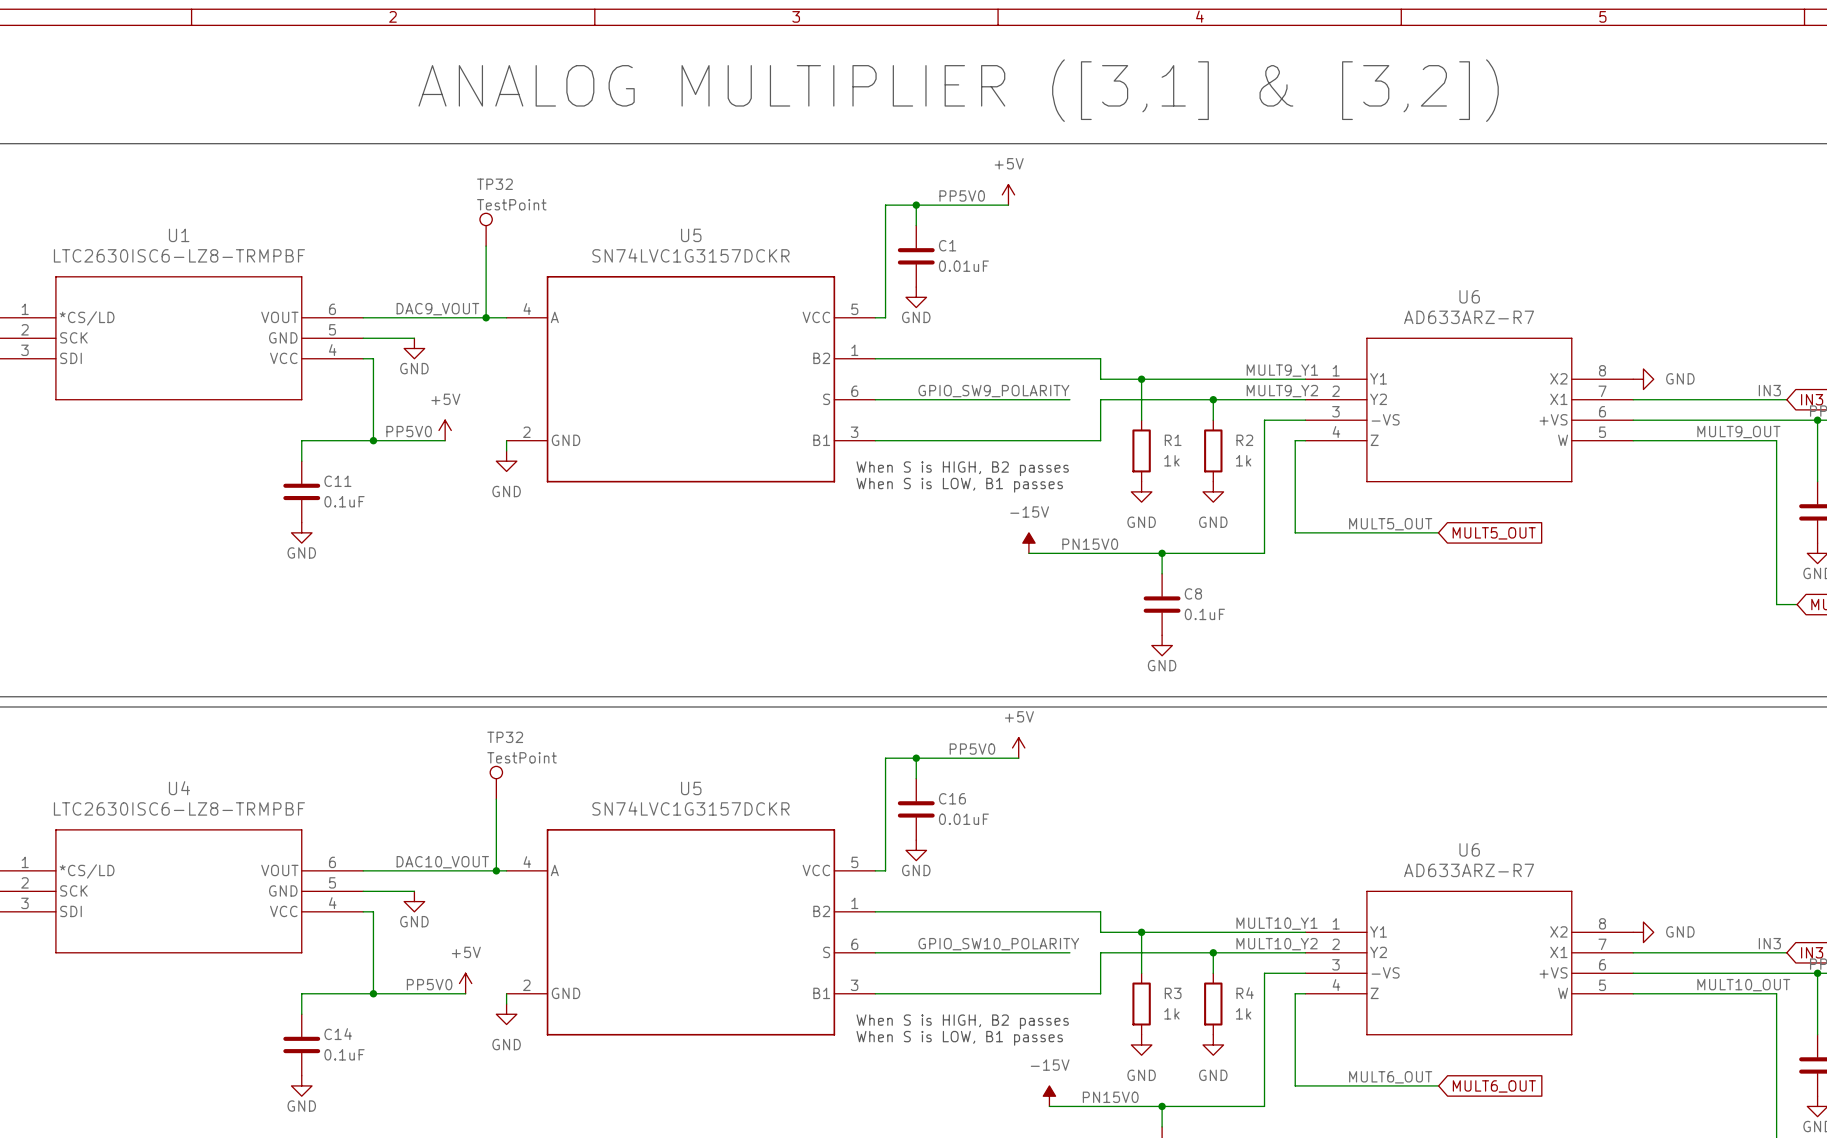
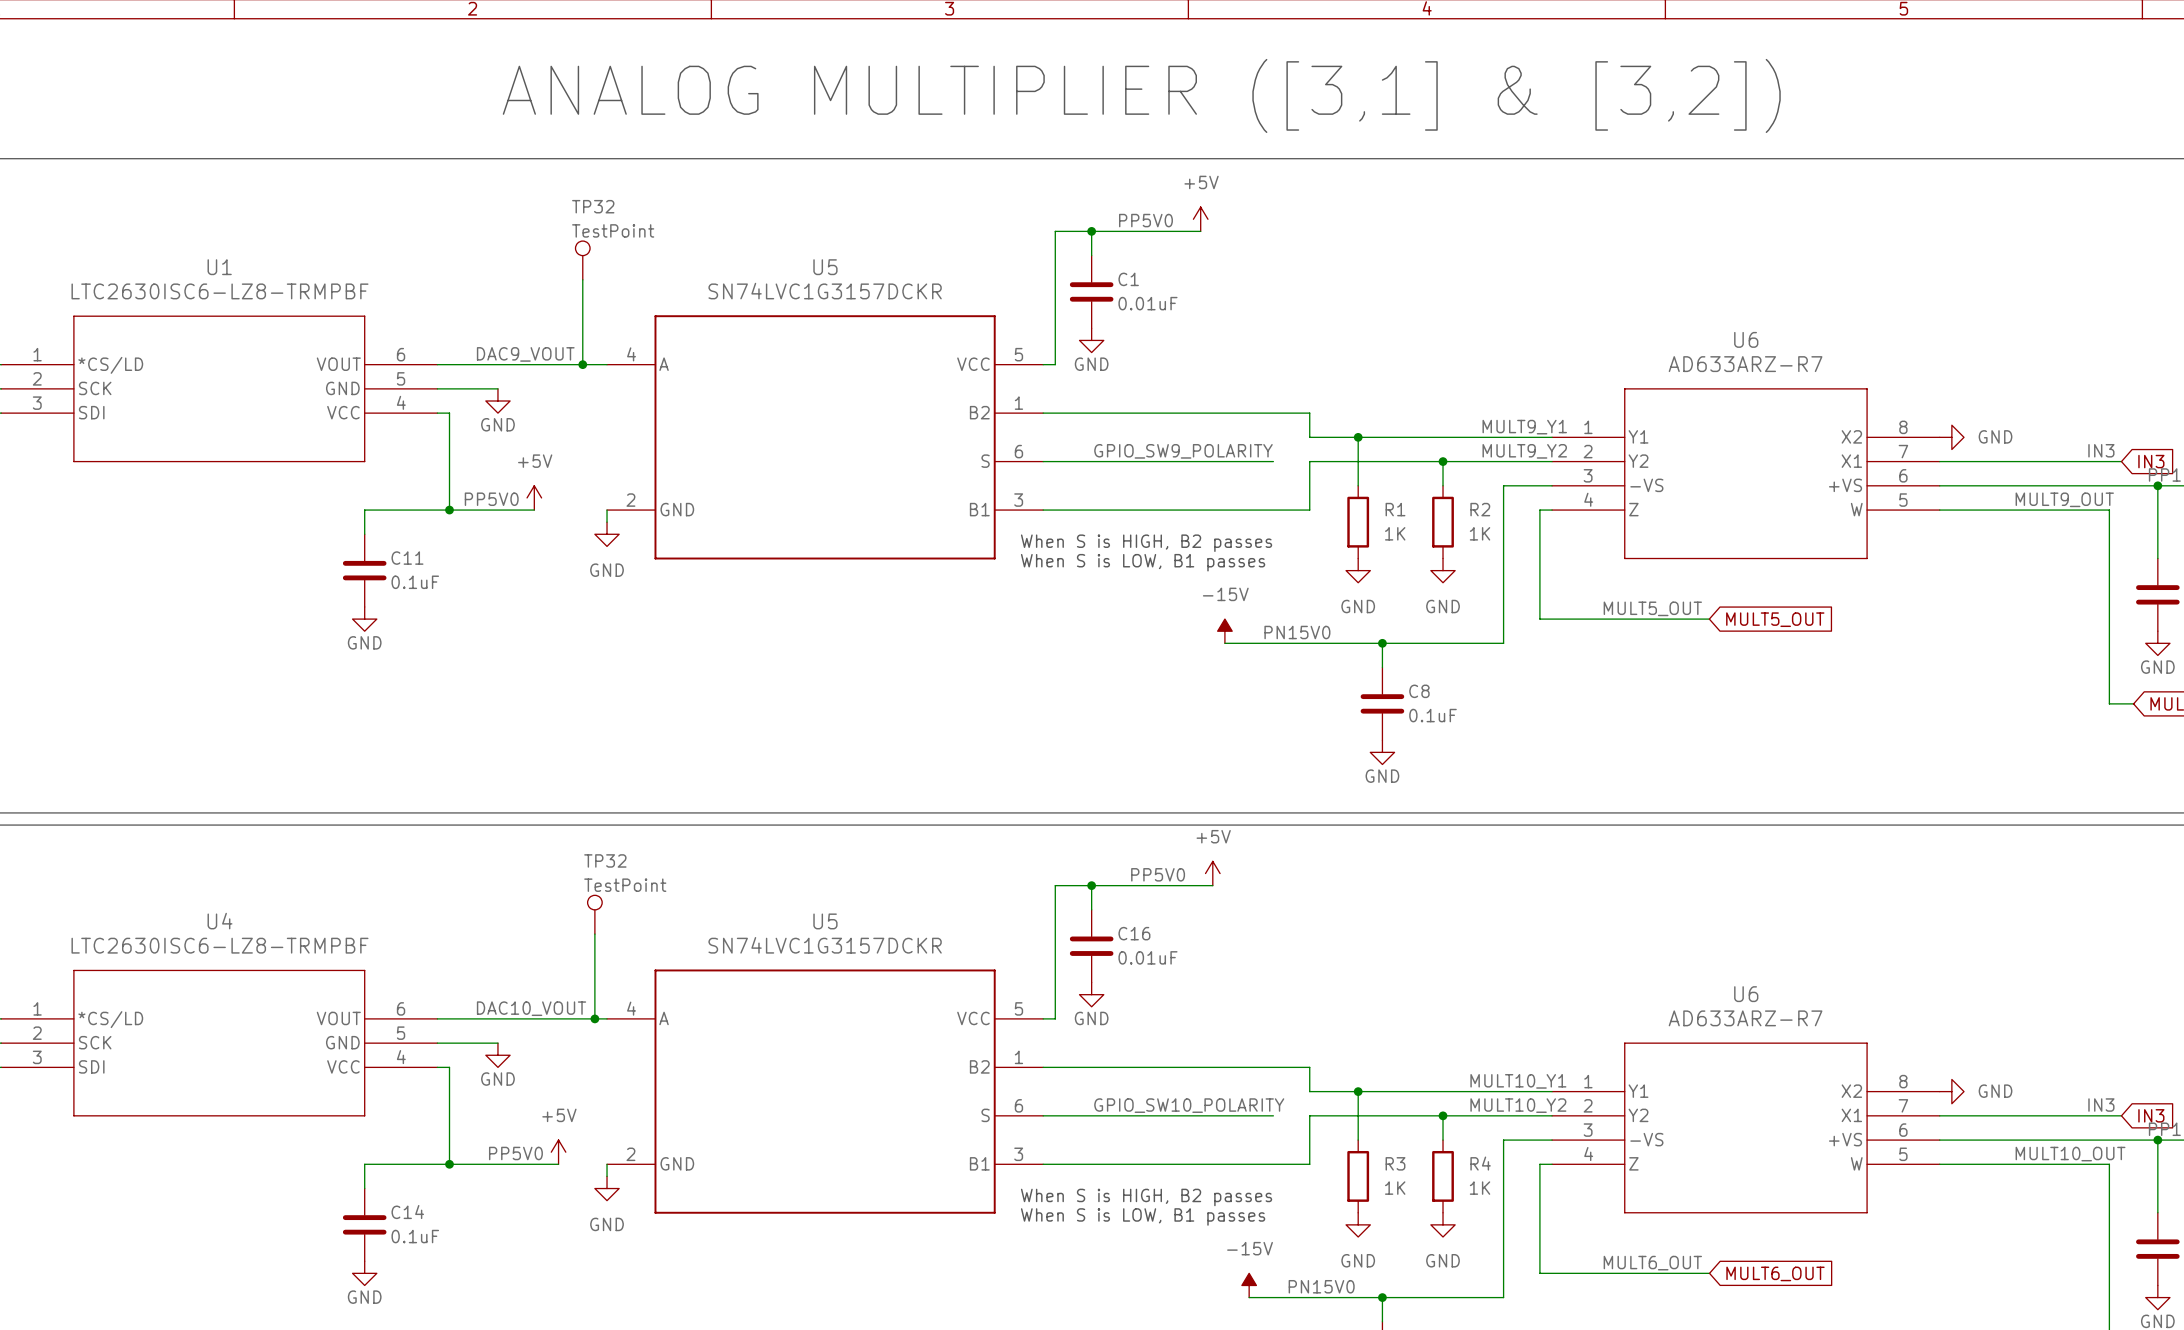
R1 value: 1k (1171, 460) -> 1K (1395, 533)
R2 value: 1k (1243, 460) -> 1K (1480, 533)
R3 value: 1k (1171, 1013) -> 1K (1395, 1188)
R4 value: 1k (1243, 1013) -> 1K (1480, 1188)

